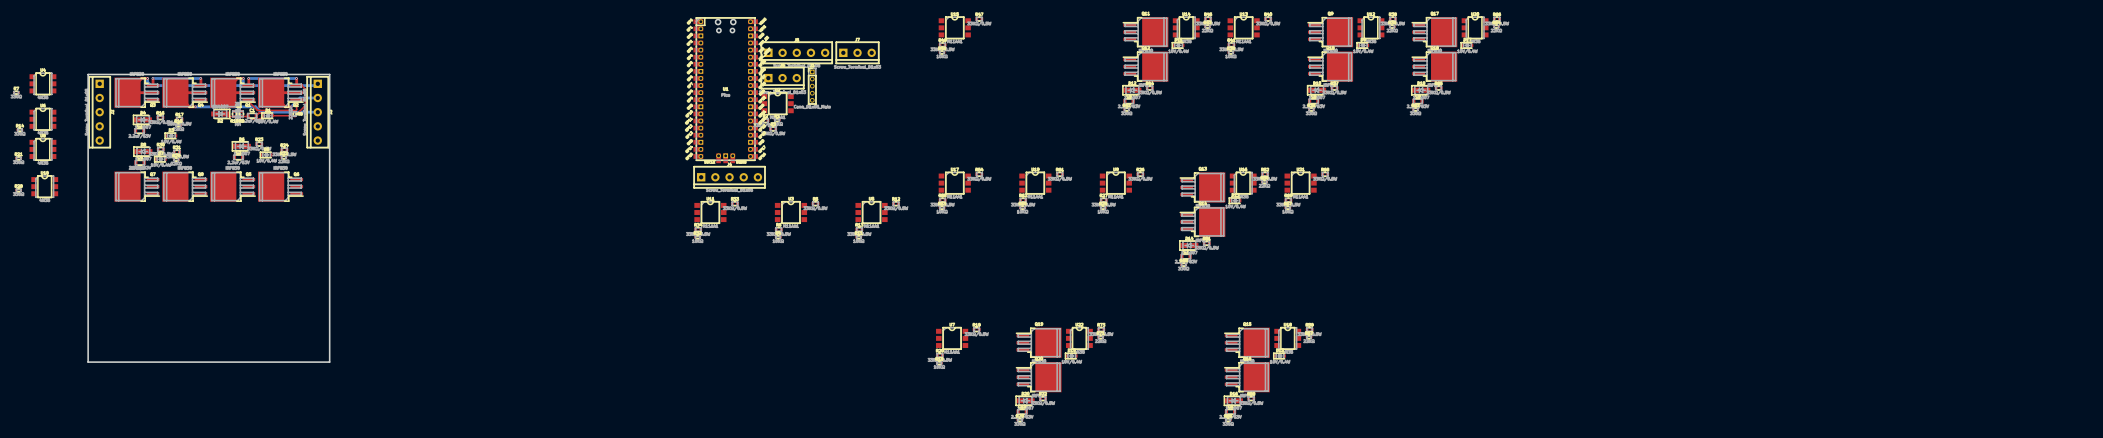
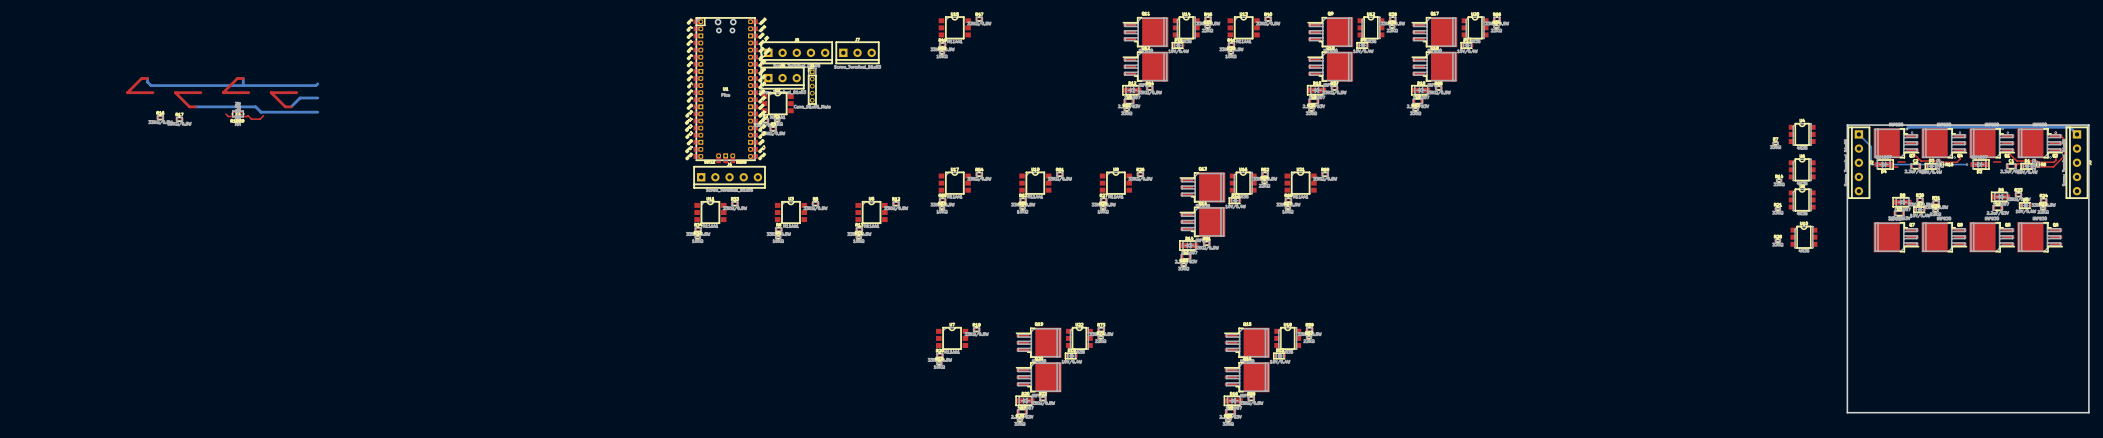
board edge: (88, 74) (329, 74) (329, 362) (88, 362) (88, 74) -> none
via: (147, 78) -> none
top track: (152, 78) (153, 85) -> none
bottom track: (152, 78) (200, 78) -> none
via: (152, 78) -> none
top track: (200, 78) (200, 85) -> none
via: (200, 78) -> none
via: (243, 78) -> none
top track: (248, 78) (248, 85) -> none
bottom track: (248, 78) (296, 78) -> none
via: (248, 78) -> none
top track: (296, 78) (296, 85) (301, 85) (305, 89) (305, 105) (294, 116) (272, 115) (270, 113) (258, 113) (256, 115) -> none
via: (296, 78) -> none
part position: (42, 83) -> (1802, 134)
part position: (16, 92) -> (1775, 143)
part position: (137, 92) -> (1896, 143)
part position: (184, 92) -> (1944, 143)
part position: (232, 92) -> (1991, 143)
part position: (280, 92) -> (2039, 143)
top track: (248, 99) (257, 110) (294, 111) (296, 109) (296, 99) -> none
via: (195, 106) -> none
via: (291, 106) -> none
part position: (99, 112) -> (1858, 162)
part position: (317, 112) -> (2077, 162)
part position: (220, 113) -> (1979, 164)
part position: (294, 113) -> (2038, 164)
part position: (252, 115) -> (2011, 166)
part position: (267, 115) -> (2027, 166)
part position: (42, 119) -> (1802, 169)
part rotation: 0° (142, 119) -> 180° (1884, 164)
part position: (142, 119) -> (1884, 164)
part rotation: 0° (178, 125) -> 90° clockwise (1942, 164)
part position: (178, 125) -> (1942, 164)
board edge: none -> (1847, 125) (2088, 125) (2088, 412) (1847, 412) (1847, 125)
part position: (19, 129) -> (1779, 180)
bottom track: none -> (1906, 129) (1908, 127) (2069, 127) (2077, 134) (2075, 136)
via: none -> (1906, 129)
via: none -> (2002, 129)
part position: (139, 130) -> (1915, 166)
via: none -> (1912, 132)
via: none -> (1959, 132)
via: none -> (2007, 132)
top track: none -> (2055, 132) (2055, 136) (2061, 136) (2064, 139) (2064, 155) (2053, 166) (2031, 166) (2029, 163) (2018, 163) (2015, 166)
via: none -> (2055, 132)
bottom track: none -> (1858, 134) (1871, 146) (1871, 164) (1967, 164)
part position: (171, 135) -> (1931, 166)
part position: (259, 144) -> (2018, 194)
part position: (241, 146) -> (2000, 196)
part position: (42, 149) -> (1802, 200)
part position: (160, 149) -> (1919, 200)
part position: (284, 149) -> (2043, 200)
top track: none -> (1912, 150) (1920, 160) (1941, 162) (1956, 162) (1960, 159) (1960, 150)
top track: none -> (2008, 150) (2016, 160) (2038, 162) (2053, 162) (2055, 160) (2055, 150)
part position: (143, 151) -> (1902, 202)
part position: (176, 152) -> (1936, 202)
part position: (266, 154) -> (2025, 205)
part position: (238, 157) -> (1997, 207)
part position: (283, 157) -> (2043, 208)
via: none -> (1954, 157)
via: none -> (2050, 157)
part position: (18, 158) -> (1777, 208)
part position: (160, 159) -> (1919, 209)
part position: (176, 159) -> (1935, 210)
top track: none -> (1897, 161) (1905, 161)
top track: none -> (1993, 161) (2000, 161)
part position: (140, 162) -> (1899, 213)
top track: none -> (1889, 164) (1891, 167) (1897, 167)
via: none -> (1967, 164)
part position: (44, 186) -> (1803, 237)
part position: (137, 186) -> (1896, 237)
part position: (184, 186) -> (1944, 237)
part position: (232, 186) -> (1991, 237)
part position: (280, 186) -> (2039, 237)
part position: (18, 190) -> (1777, 240)

